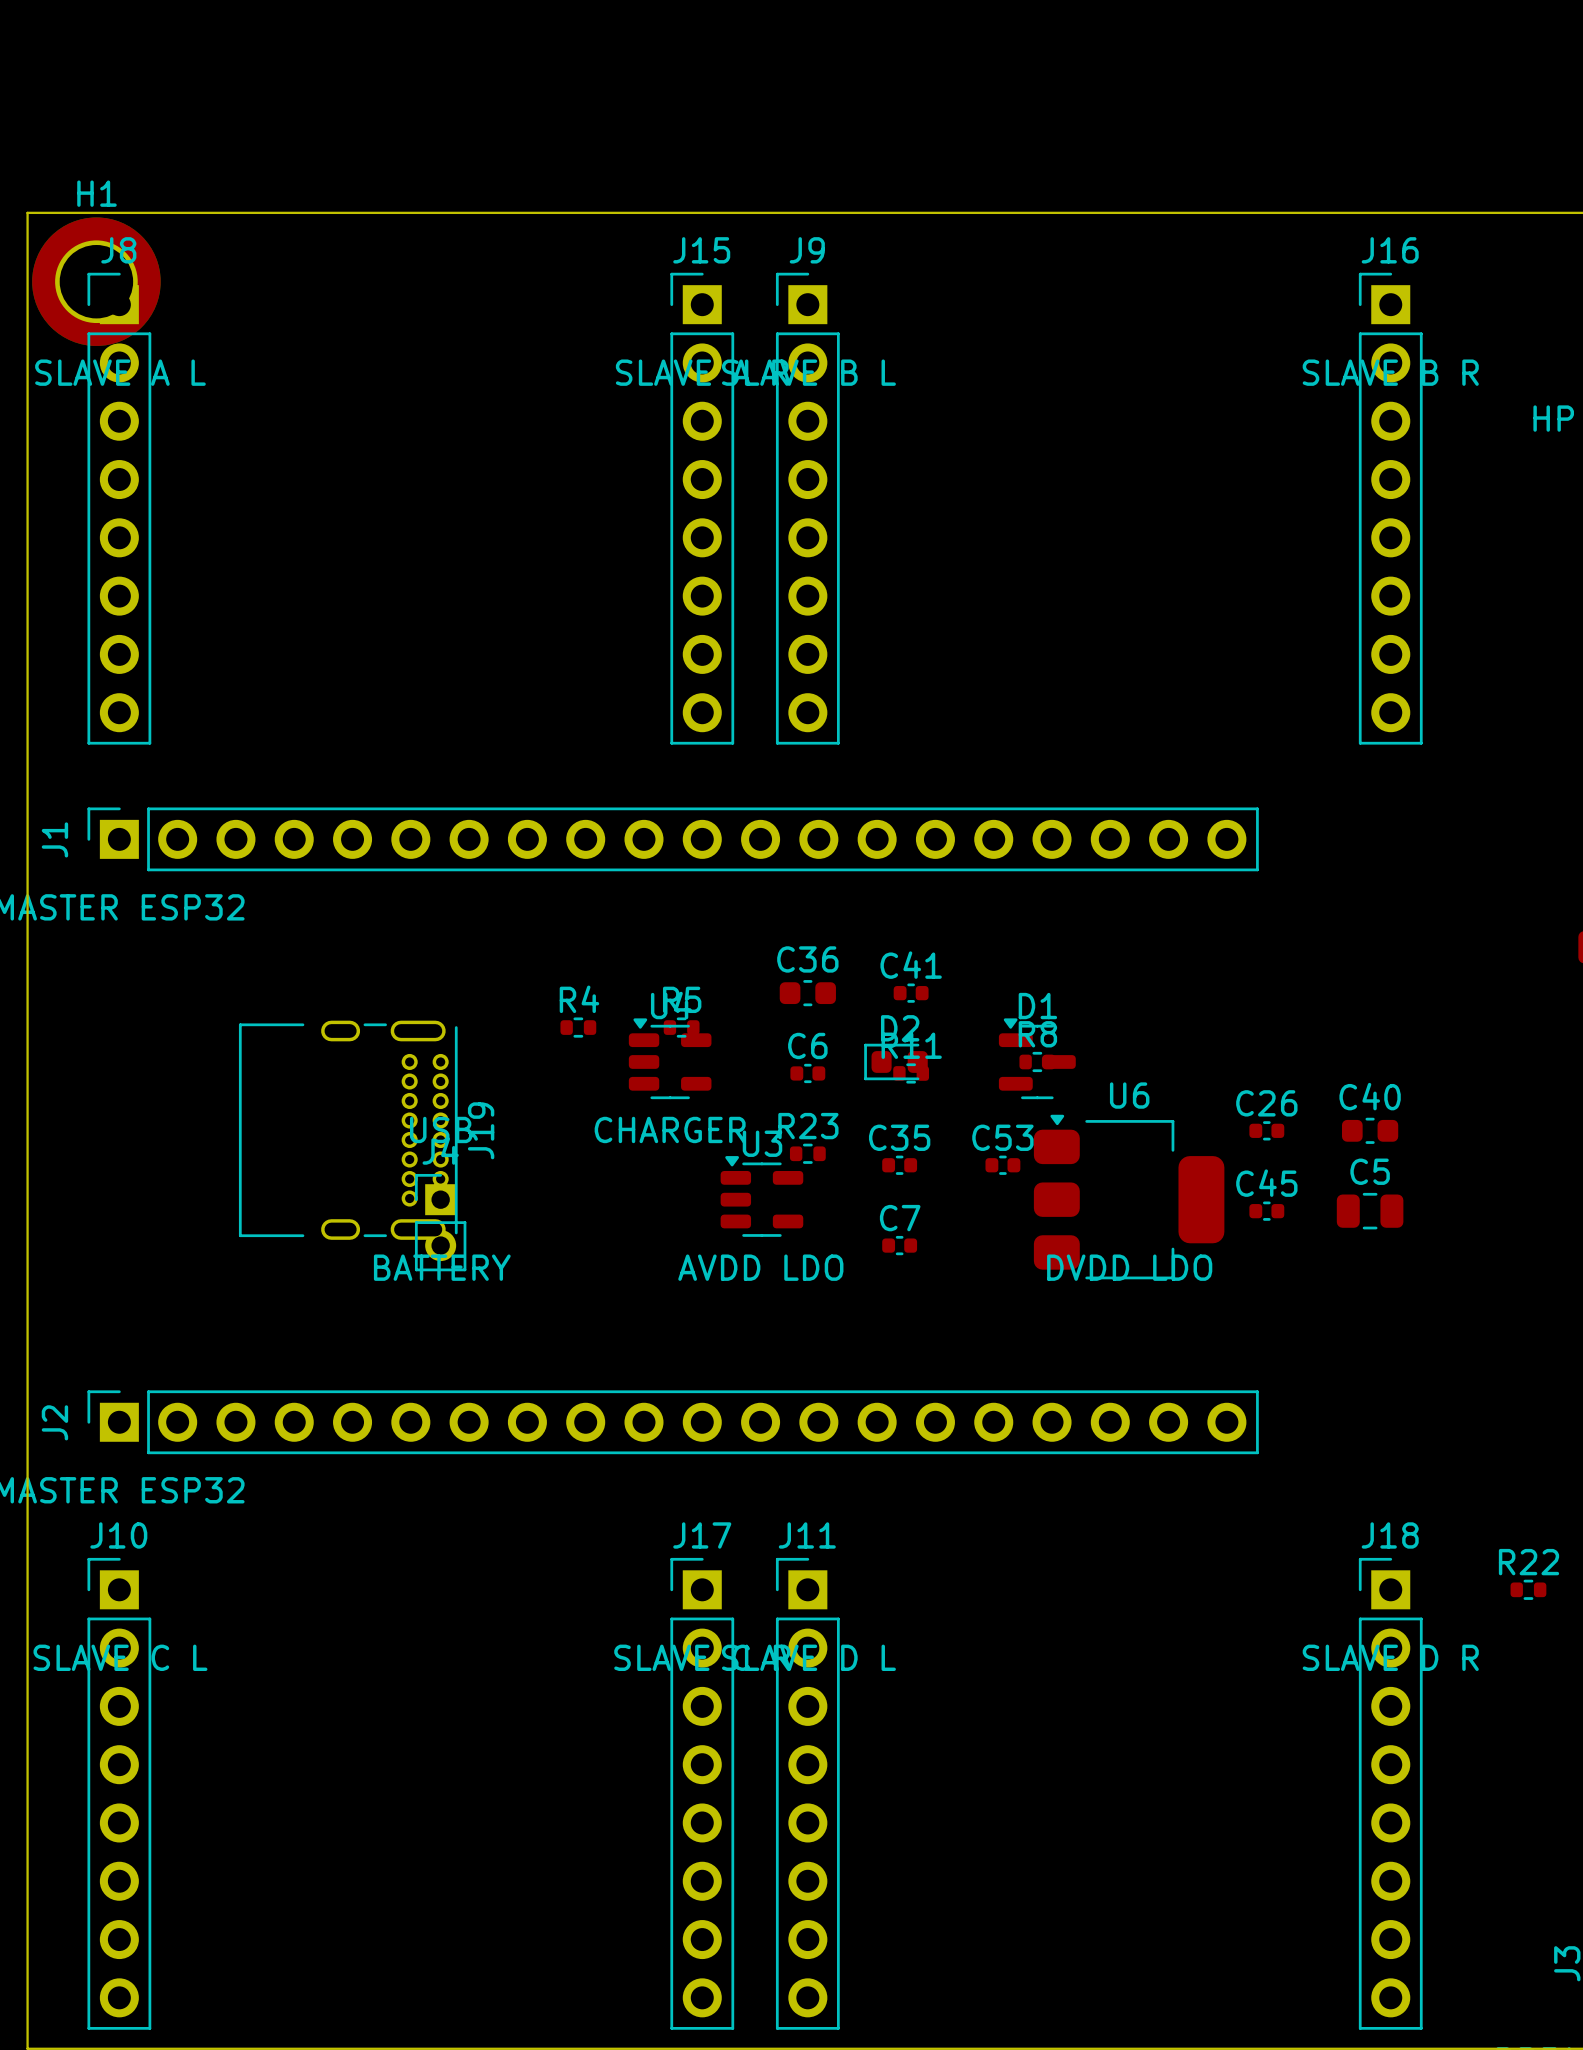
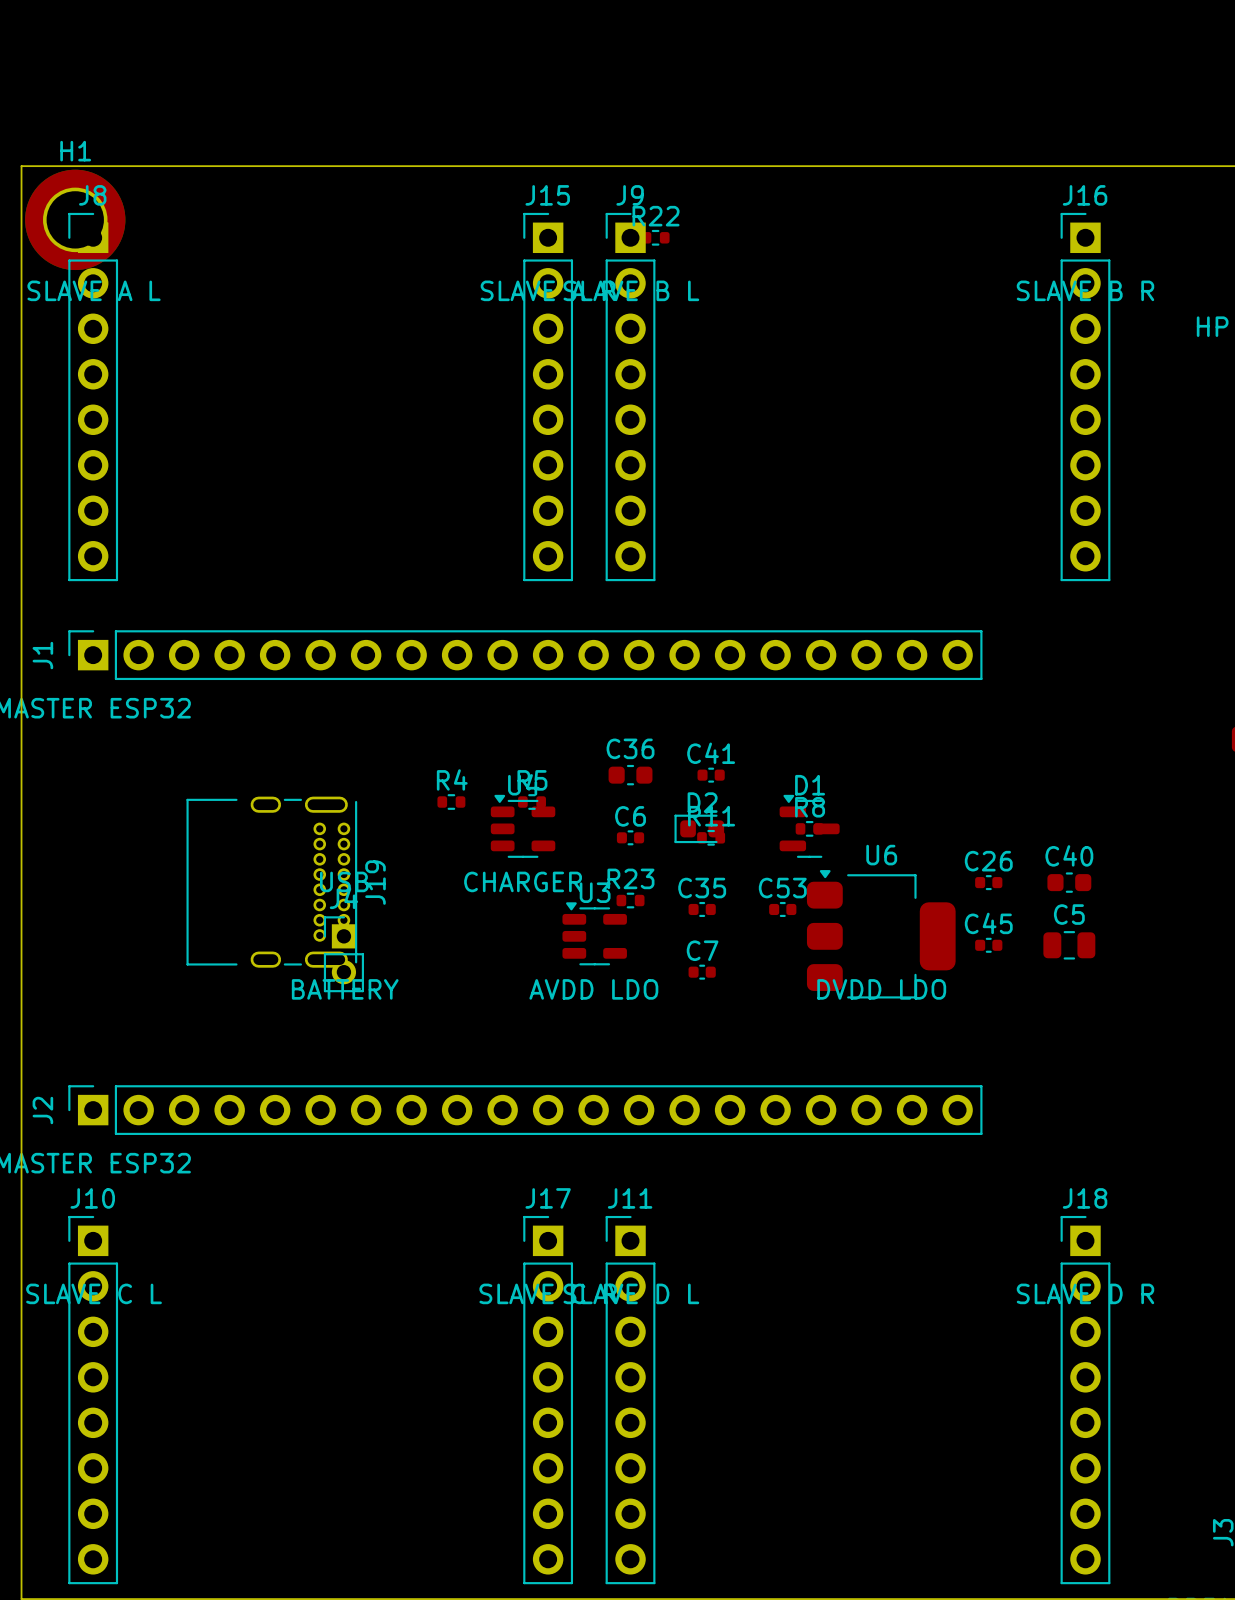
R22 position: (1528, 1589) -> (655, 237)

